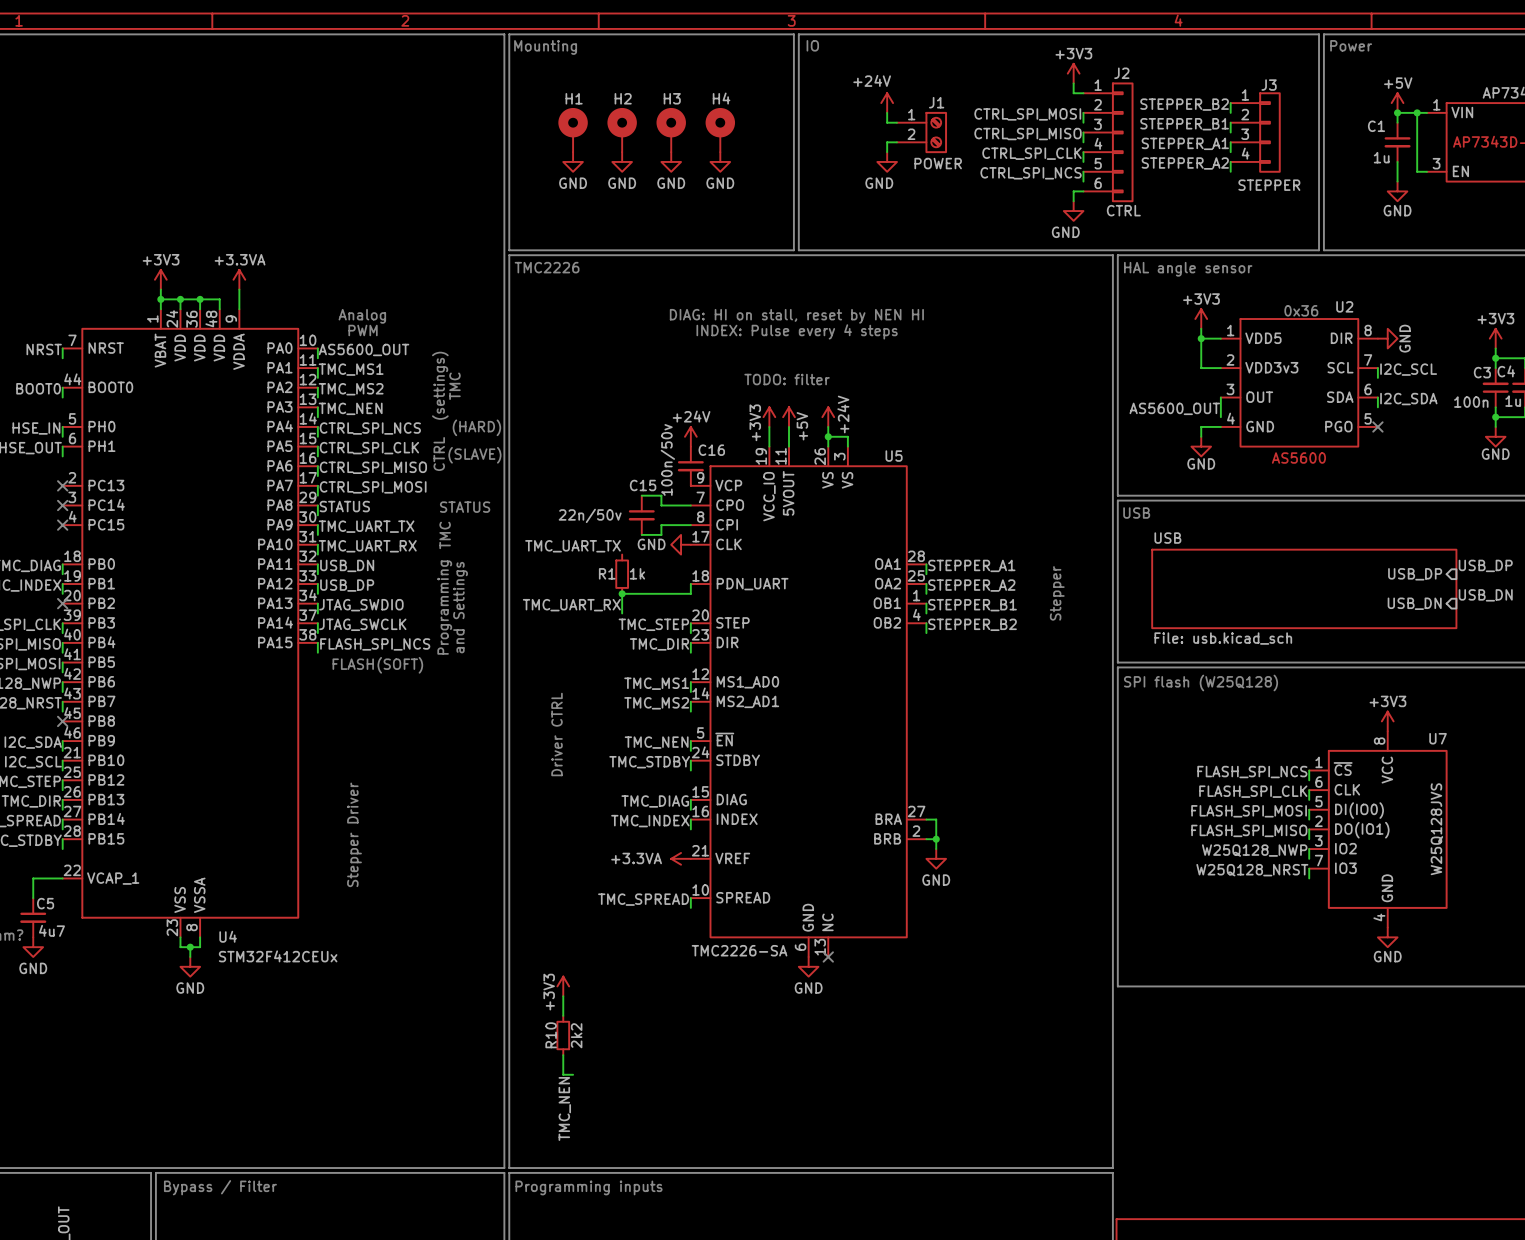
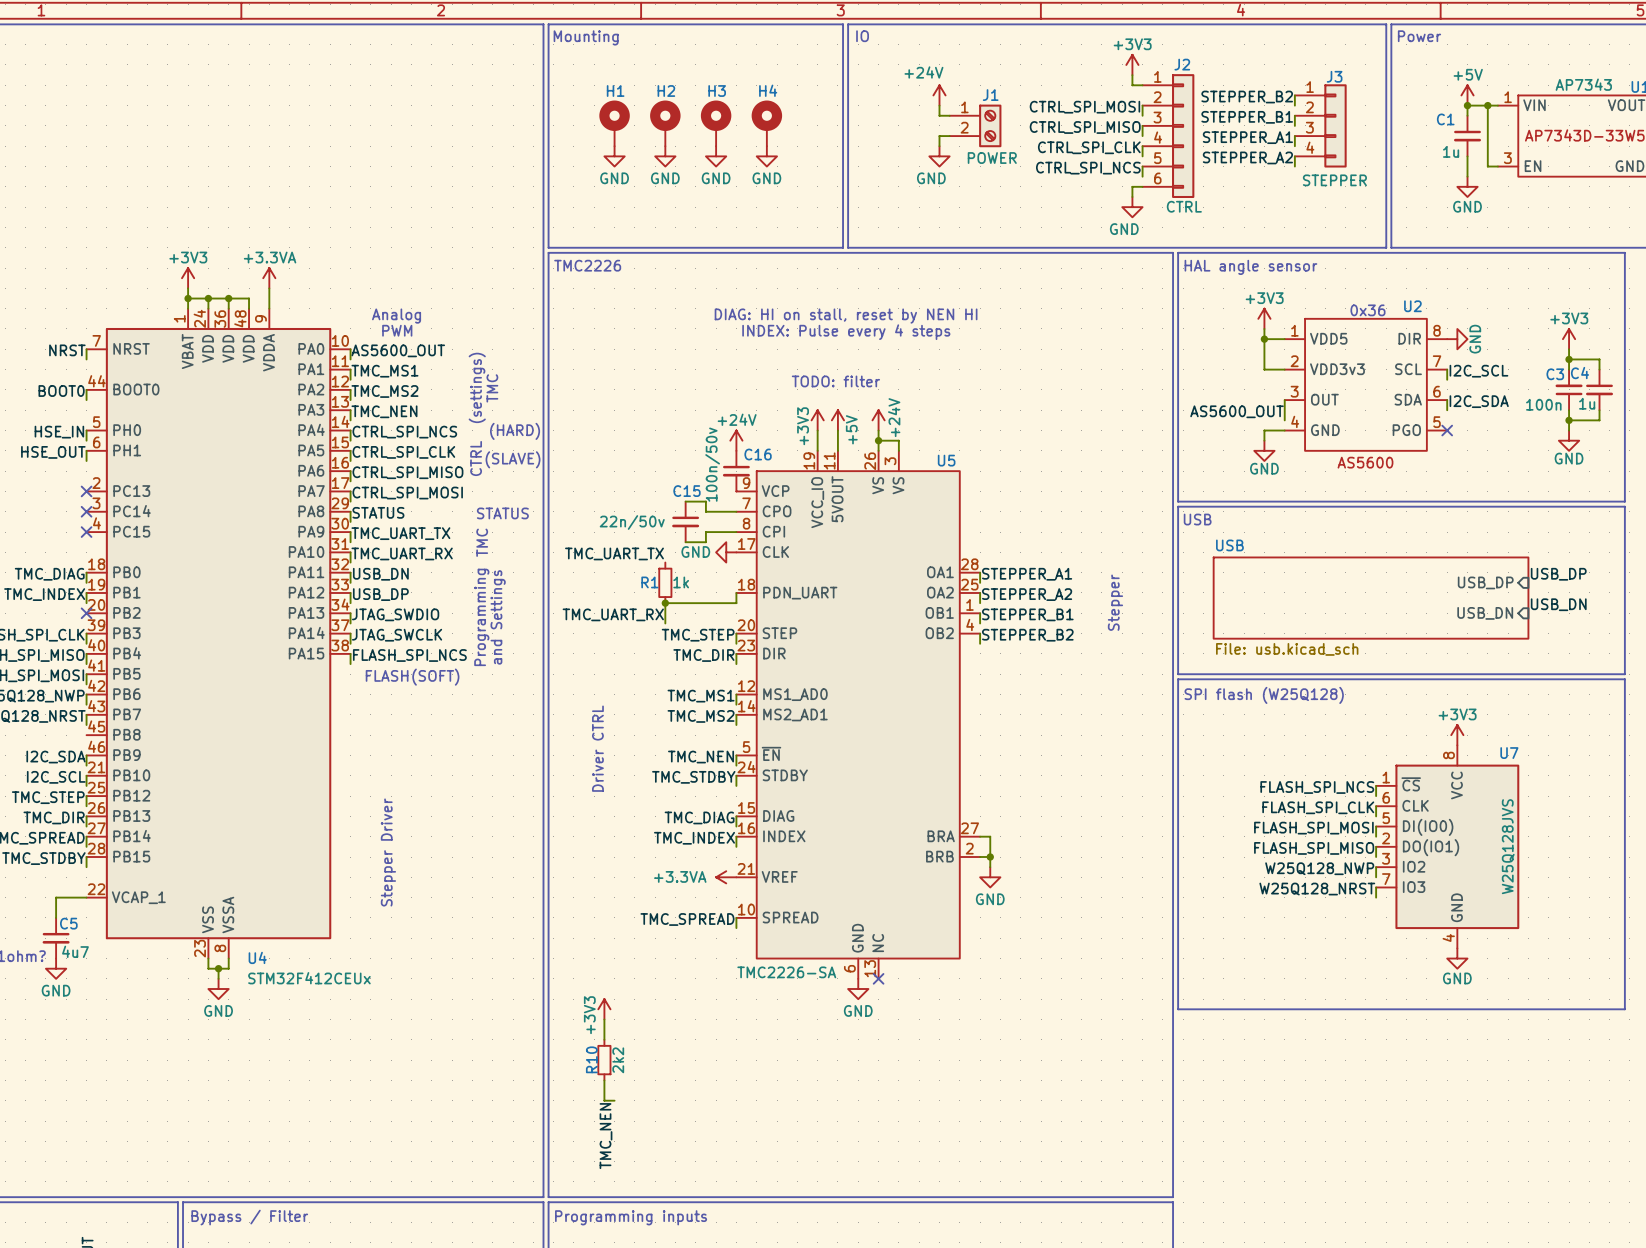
no-connect mark: (62, 721) -> none

